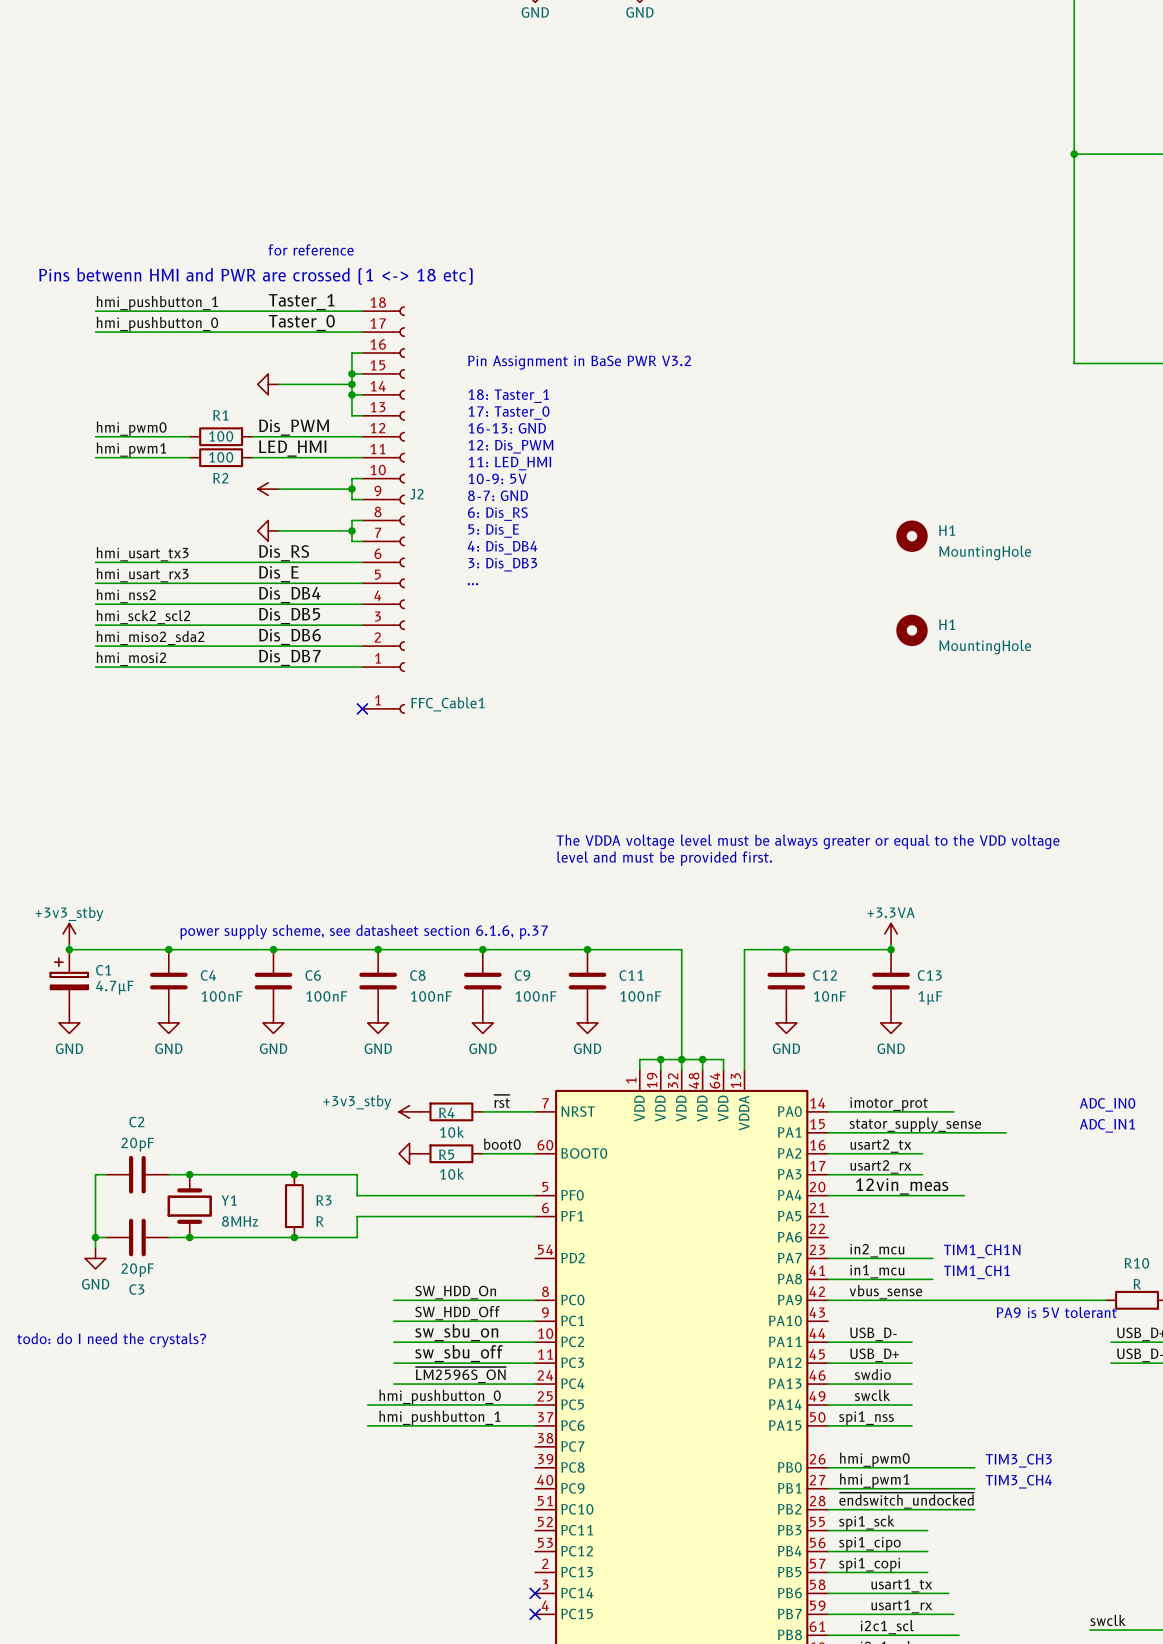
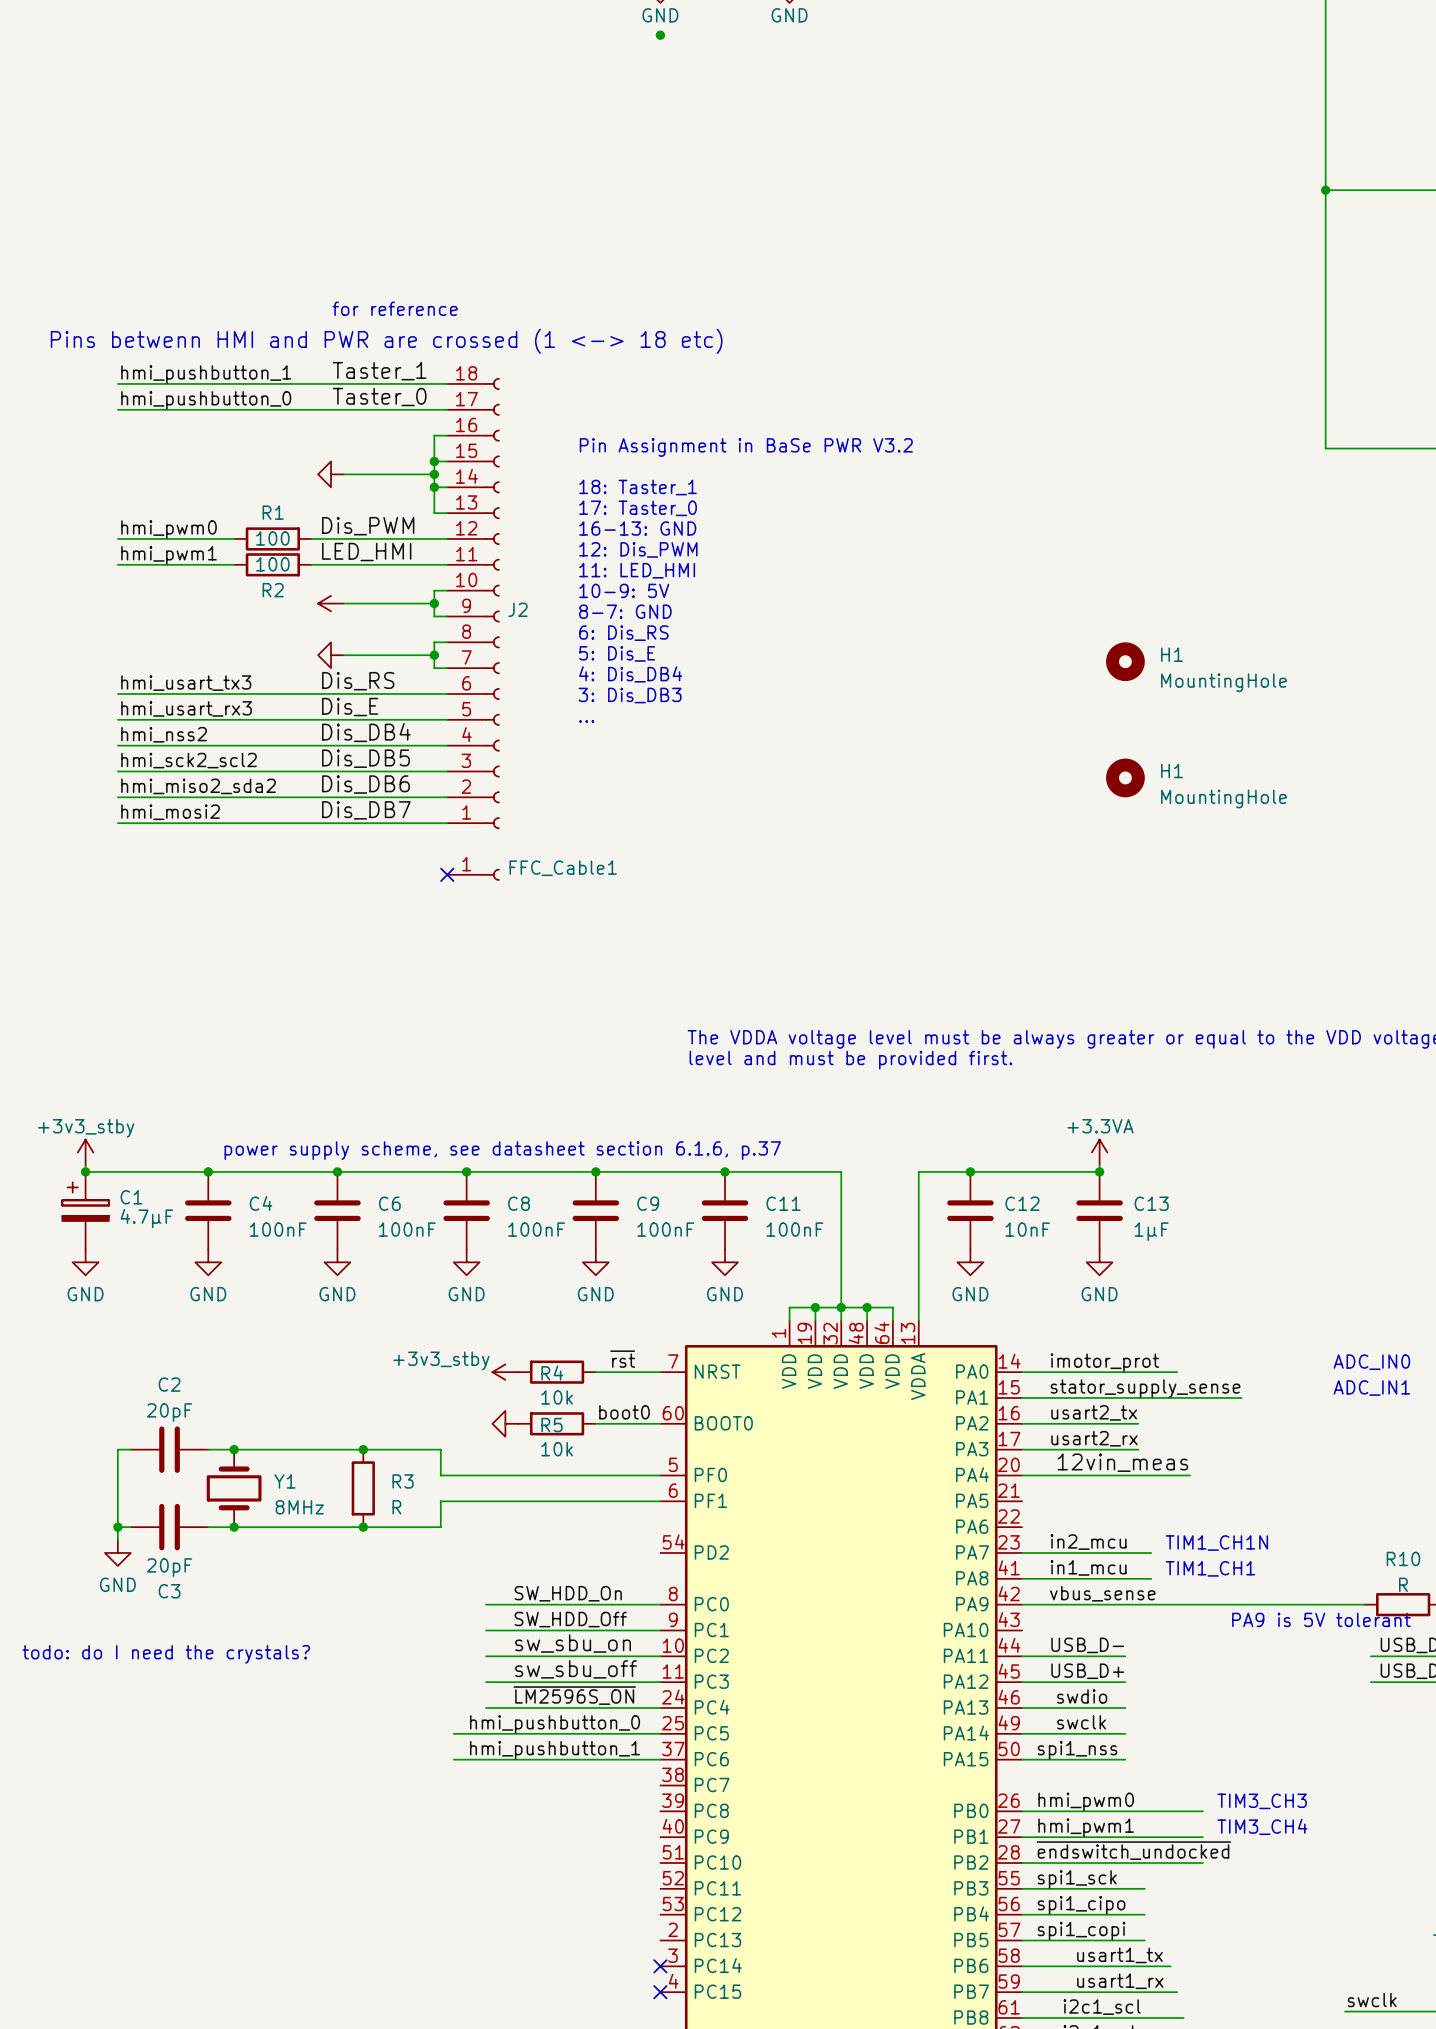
junction: none -> (660, 35)

